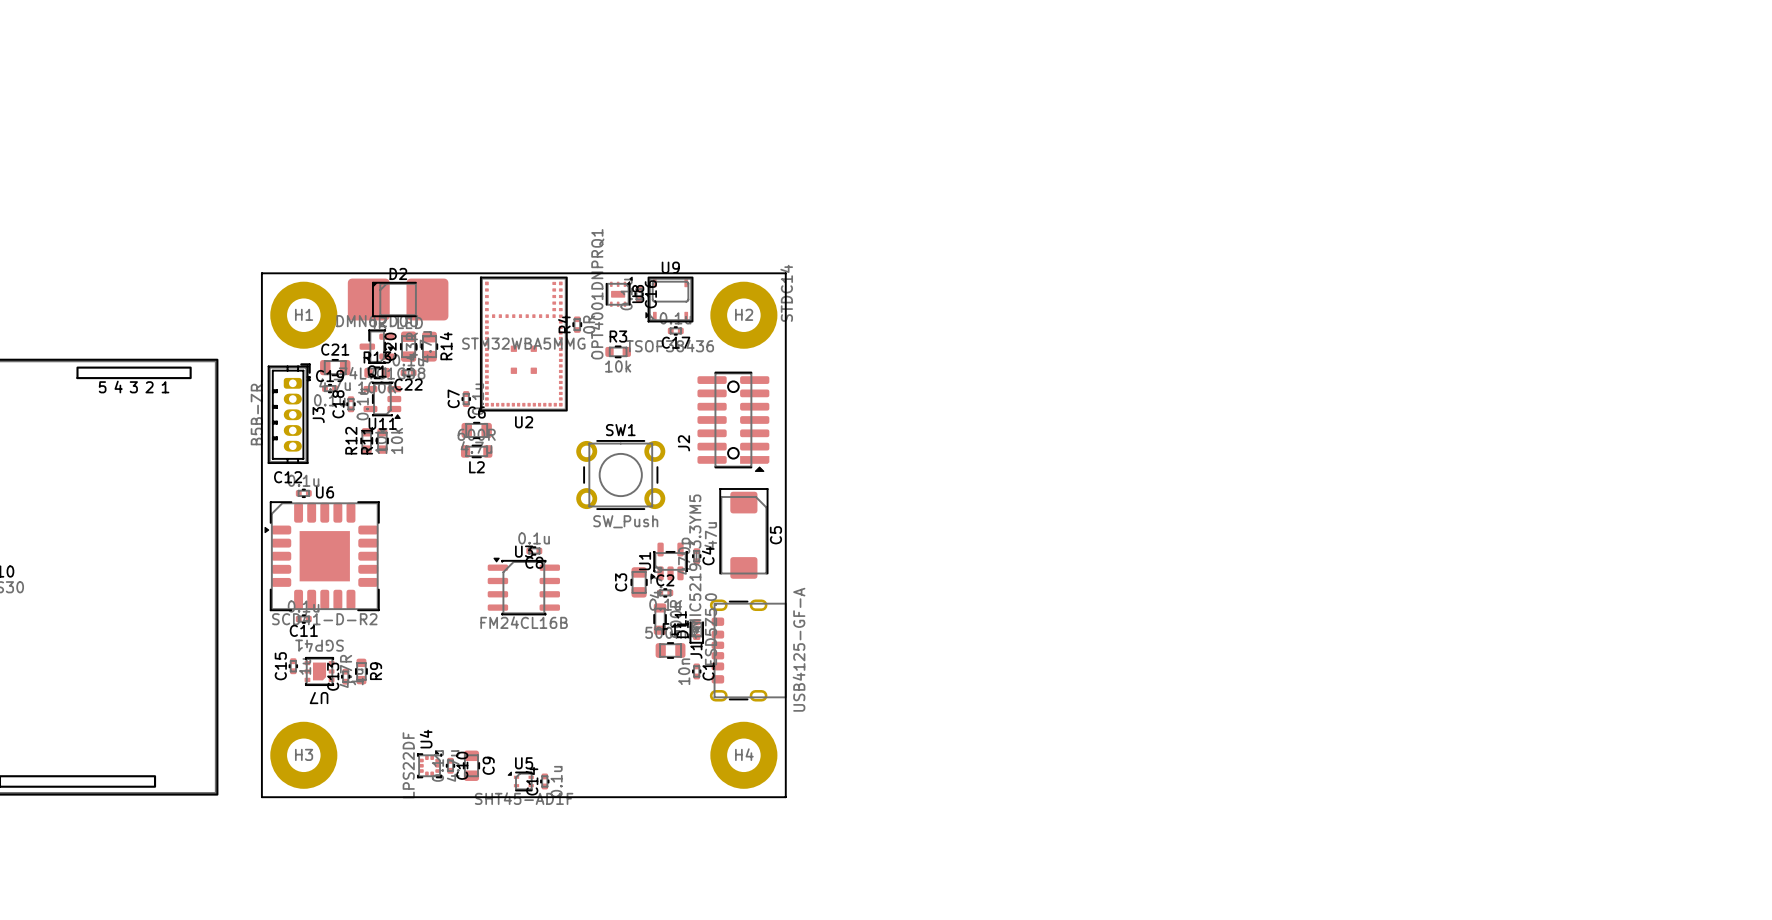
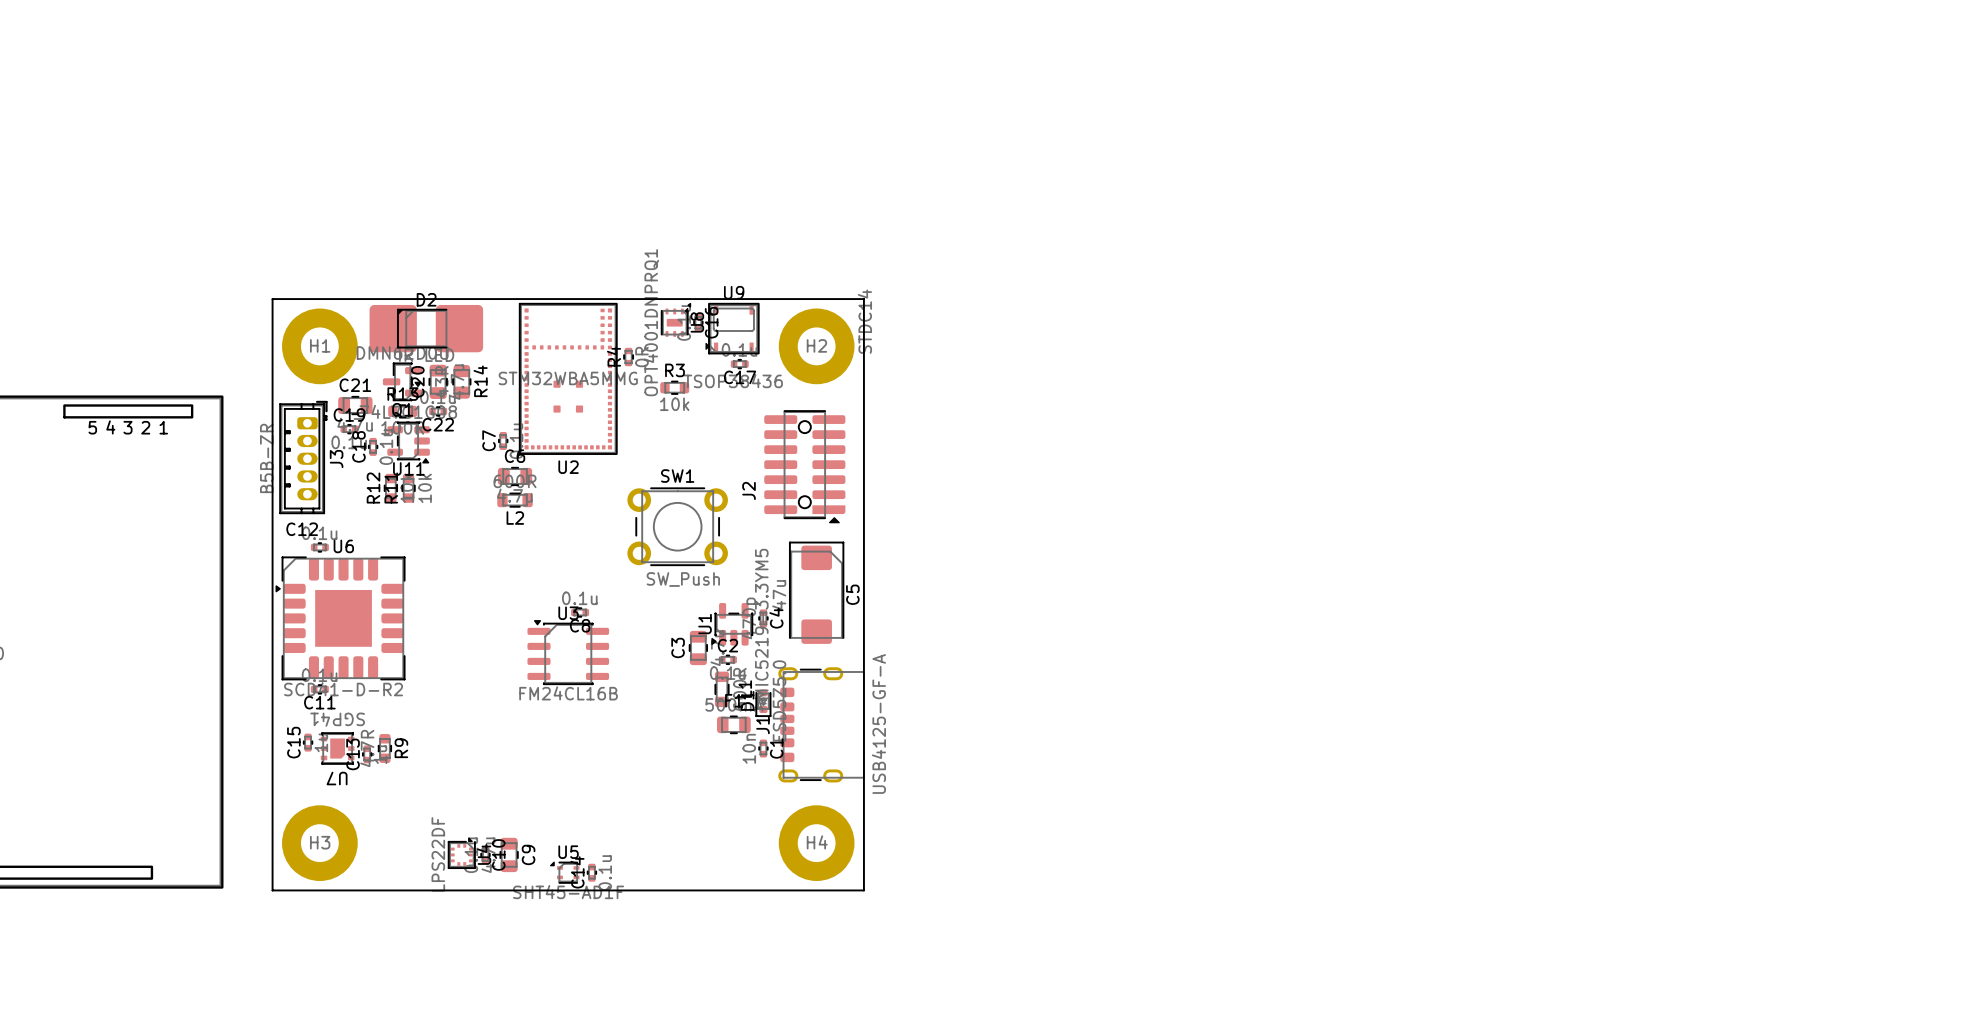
U4 name position: U4 (426, 739) -> U4 (484, 854)
U4 footprint: [417, 750, 442, 779] -> [447, 837, 476, 869]

